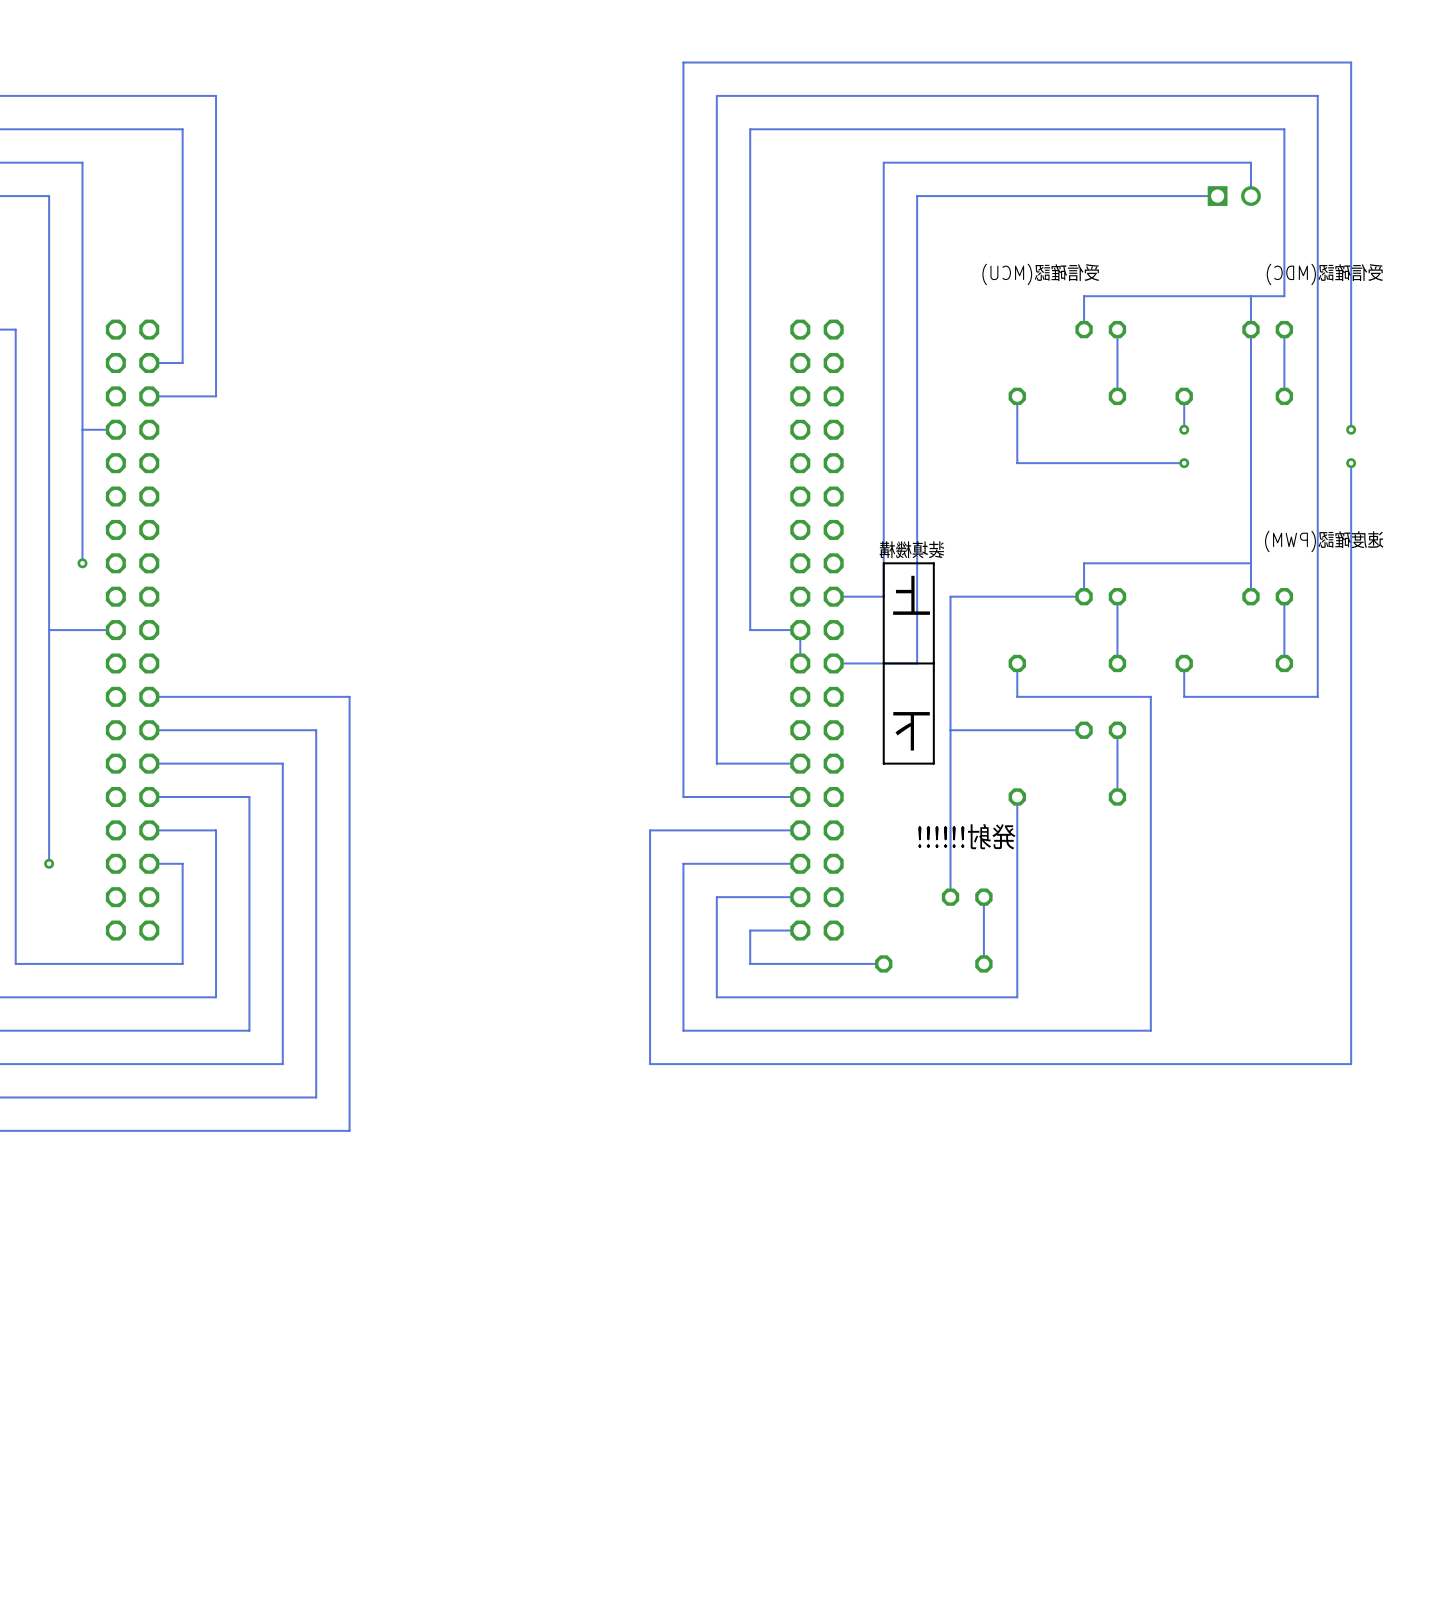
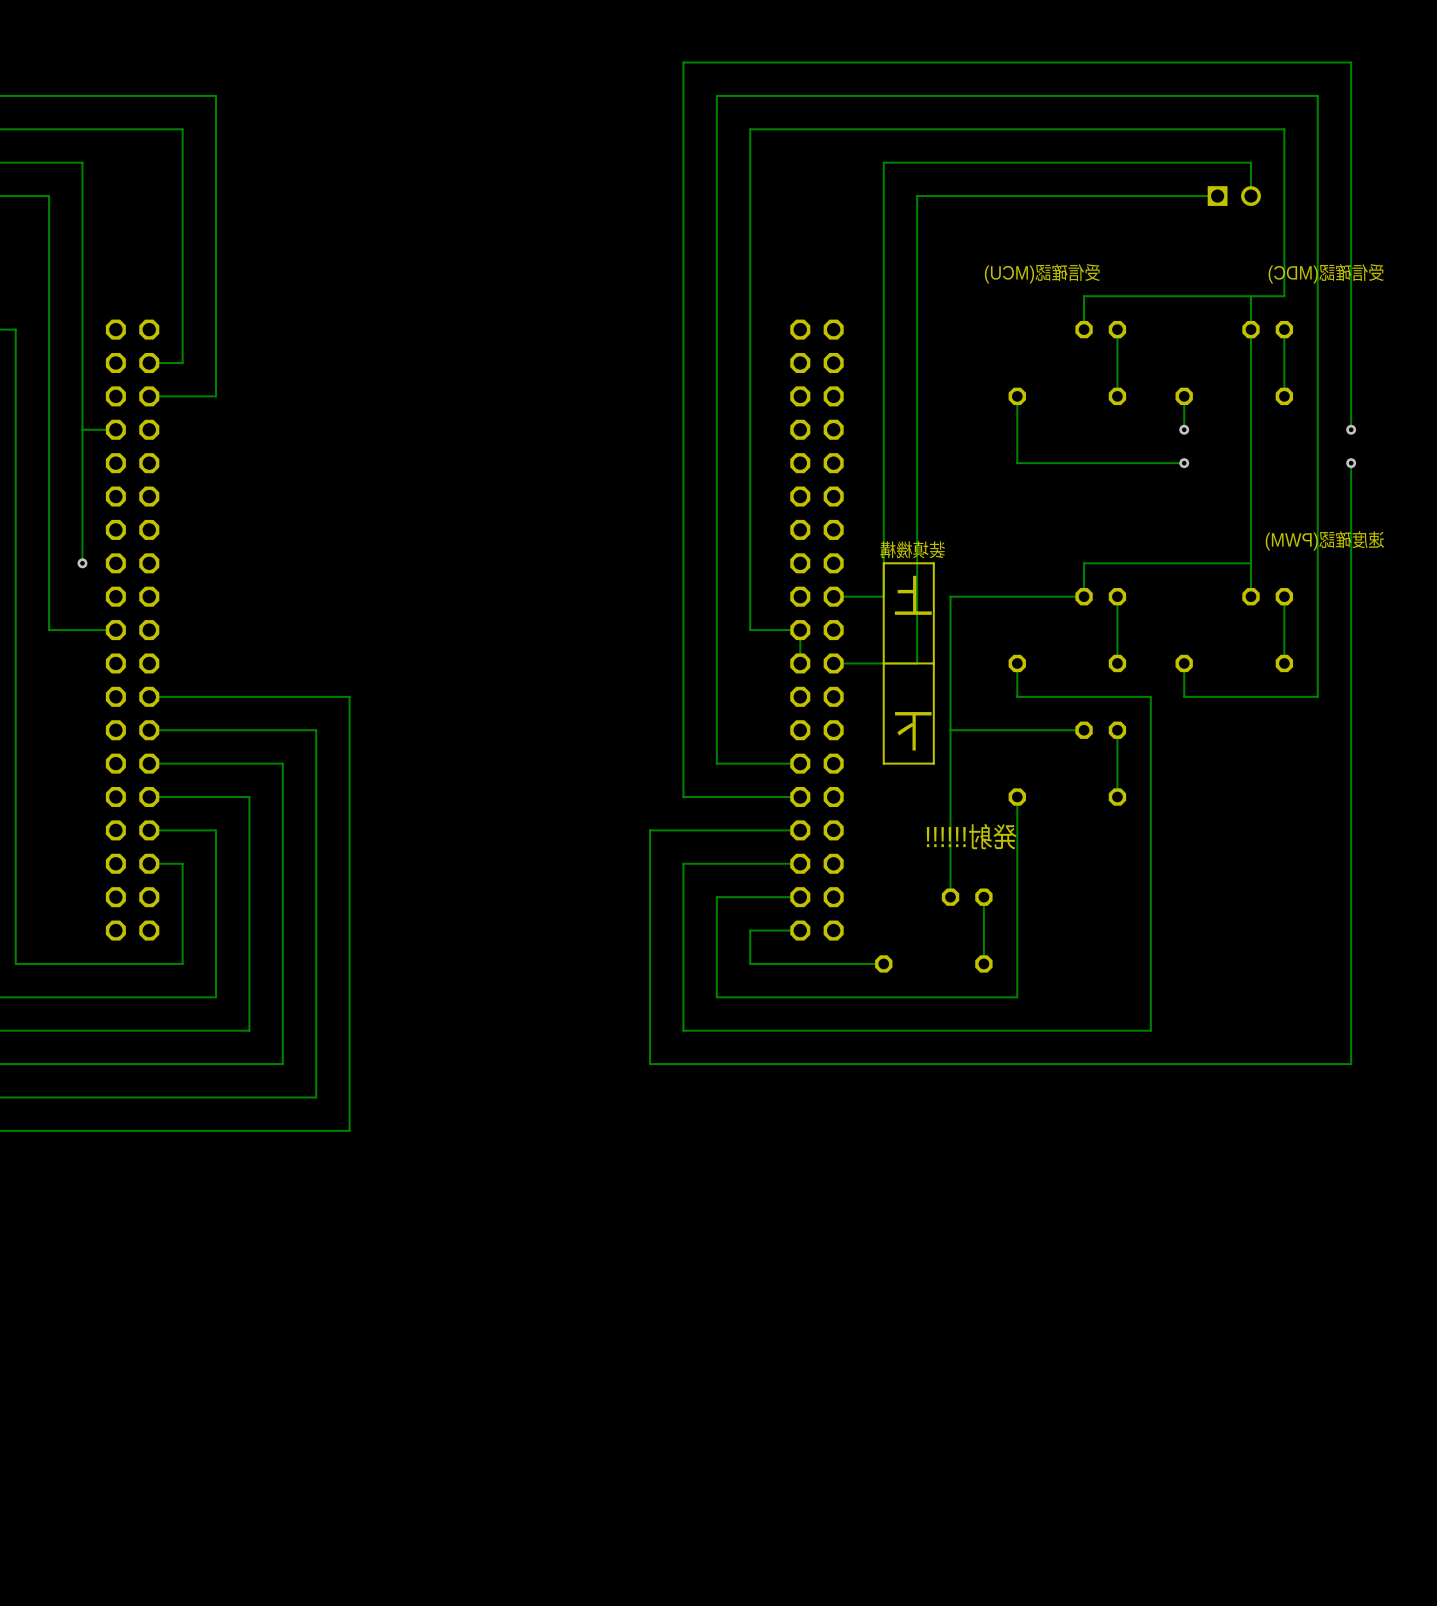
track: (49, 630) (49, 863) -> none
via: (49, 863) -> none

